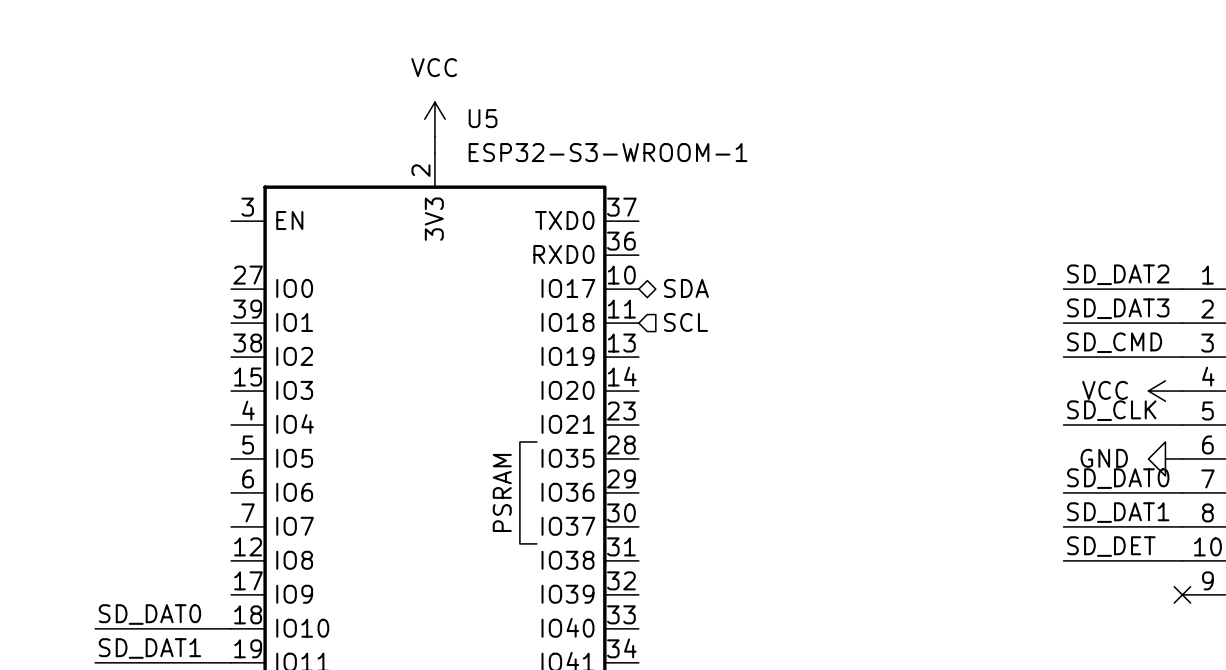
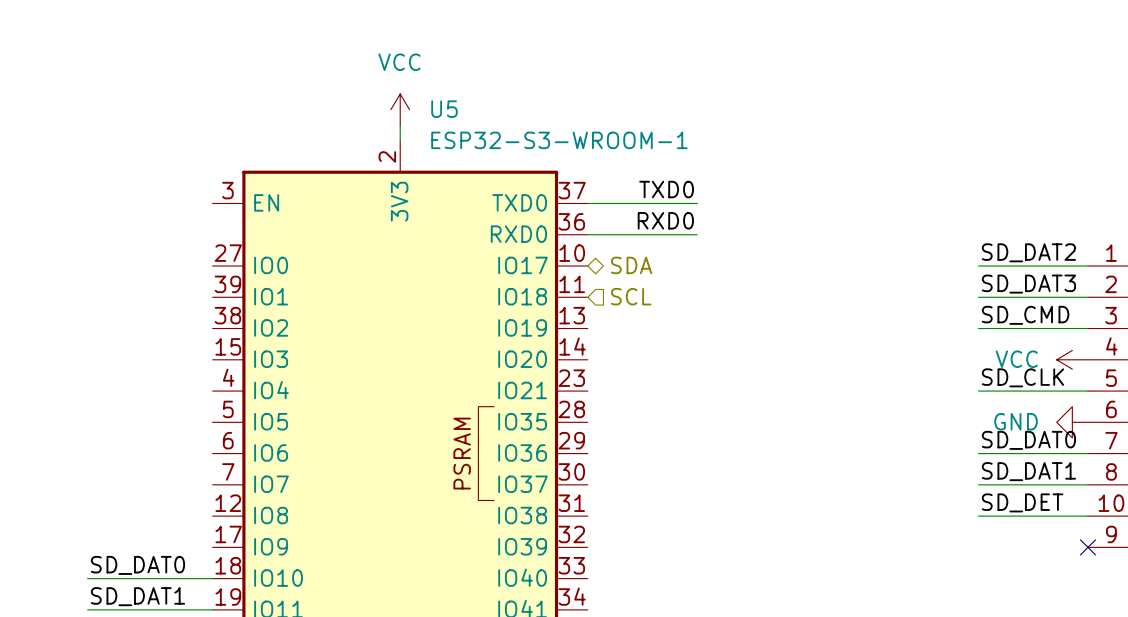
label: none -> TXD0 (666, 189)
wire: none -> (587, 203) (697, 203)
label: none -> RXD0 (665, 220)
wire: none -> (587, 234) (697, 234)

